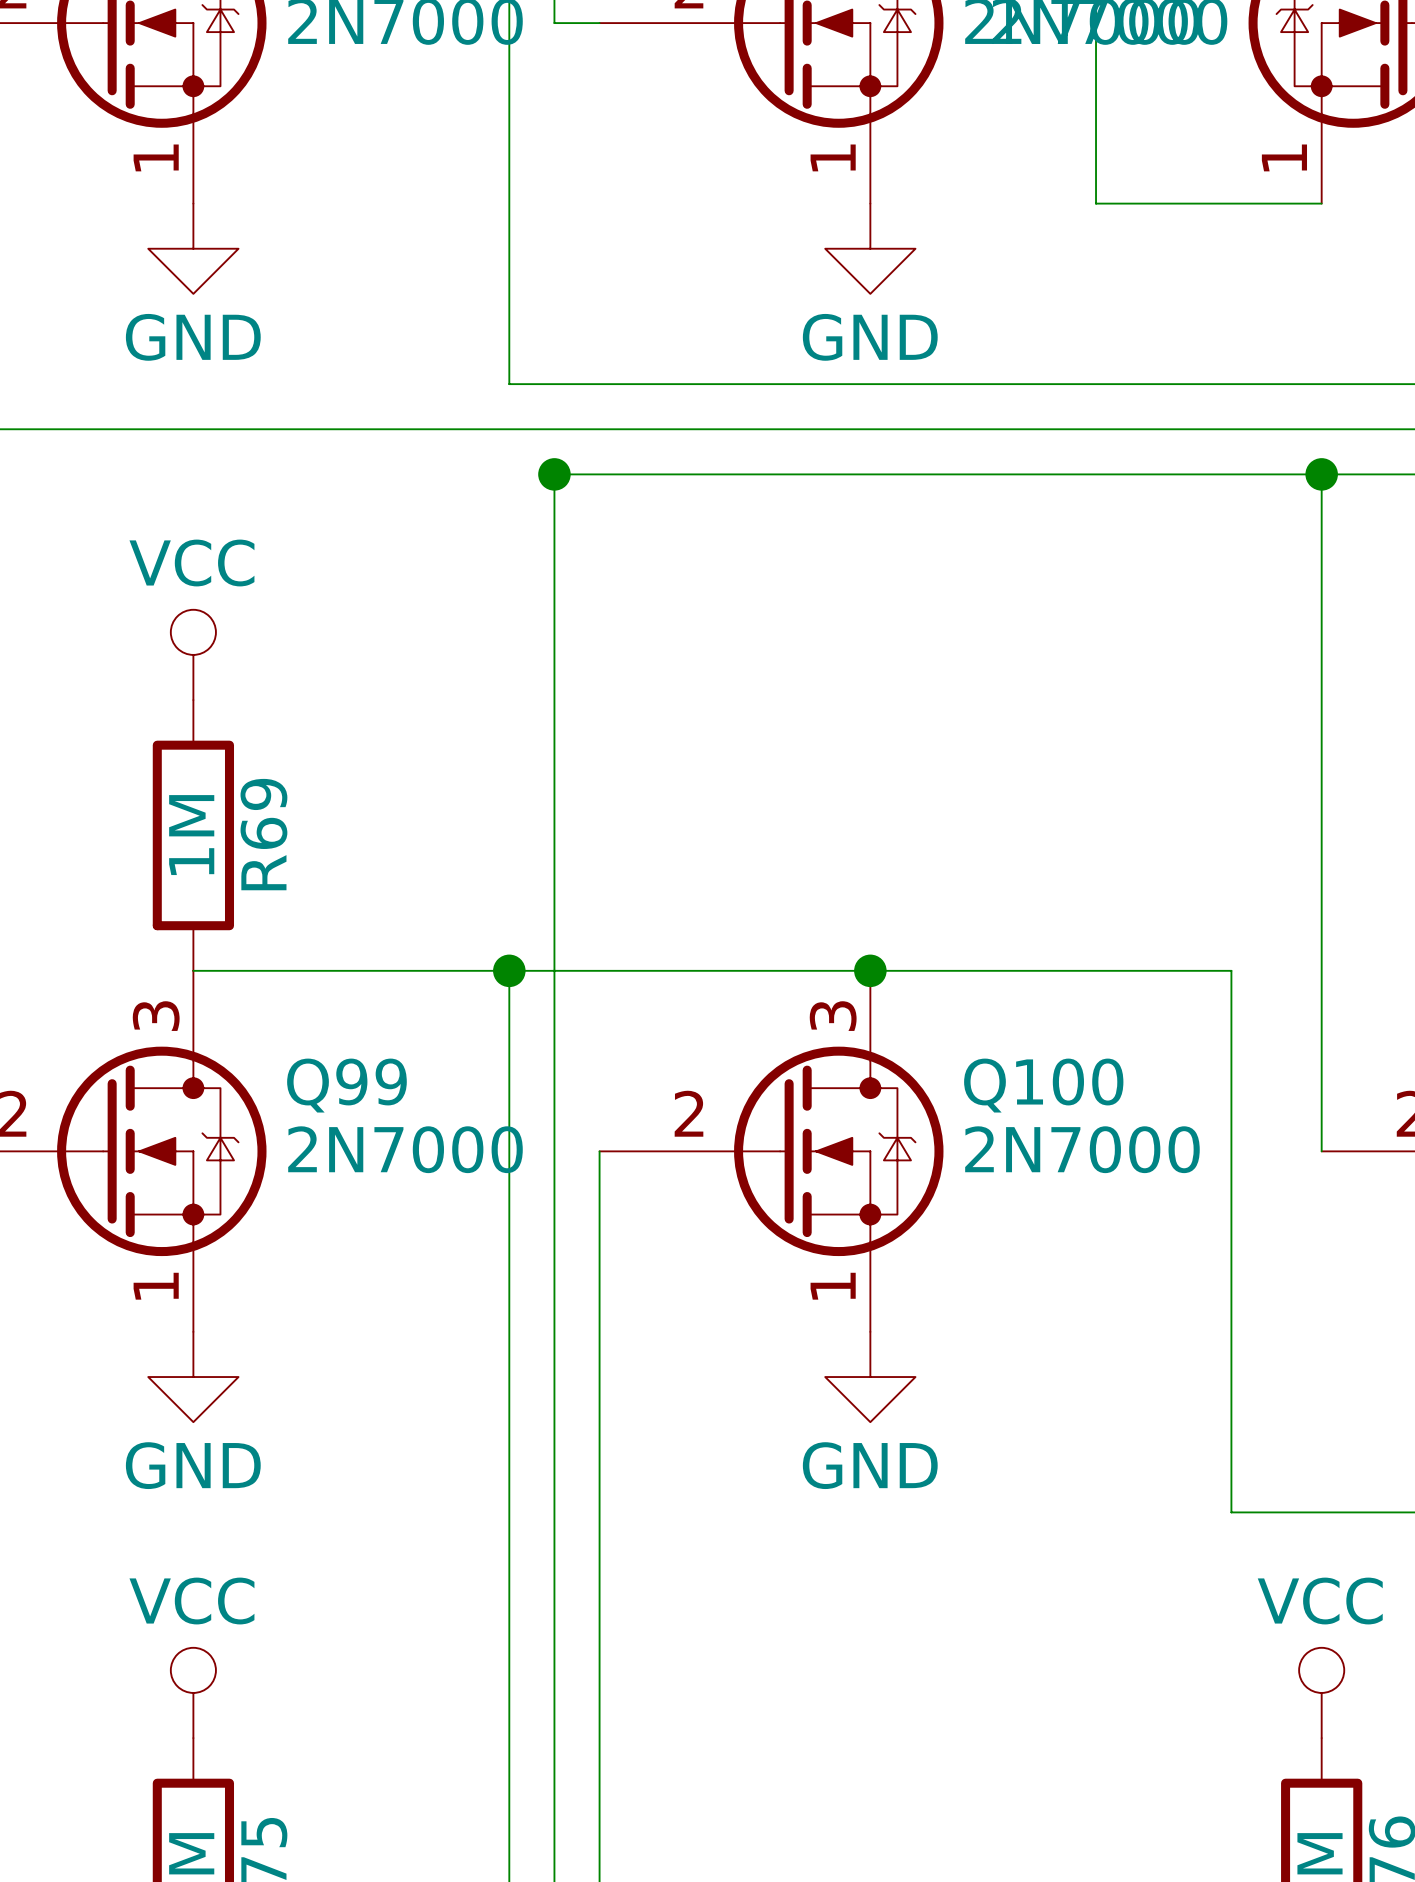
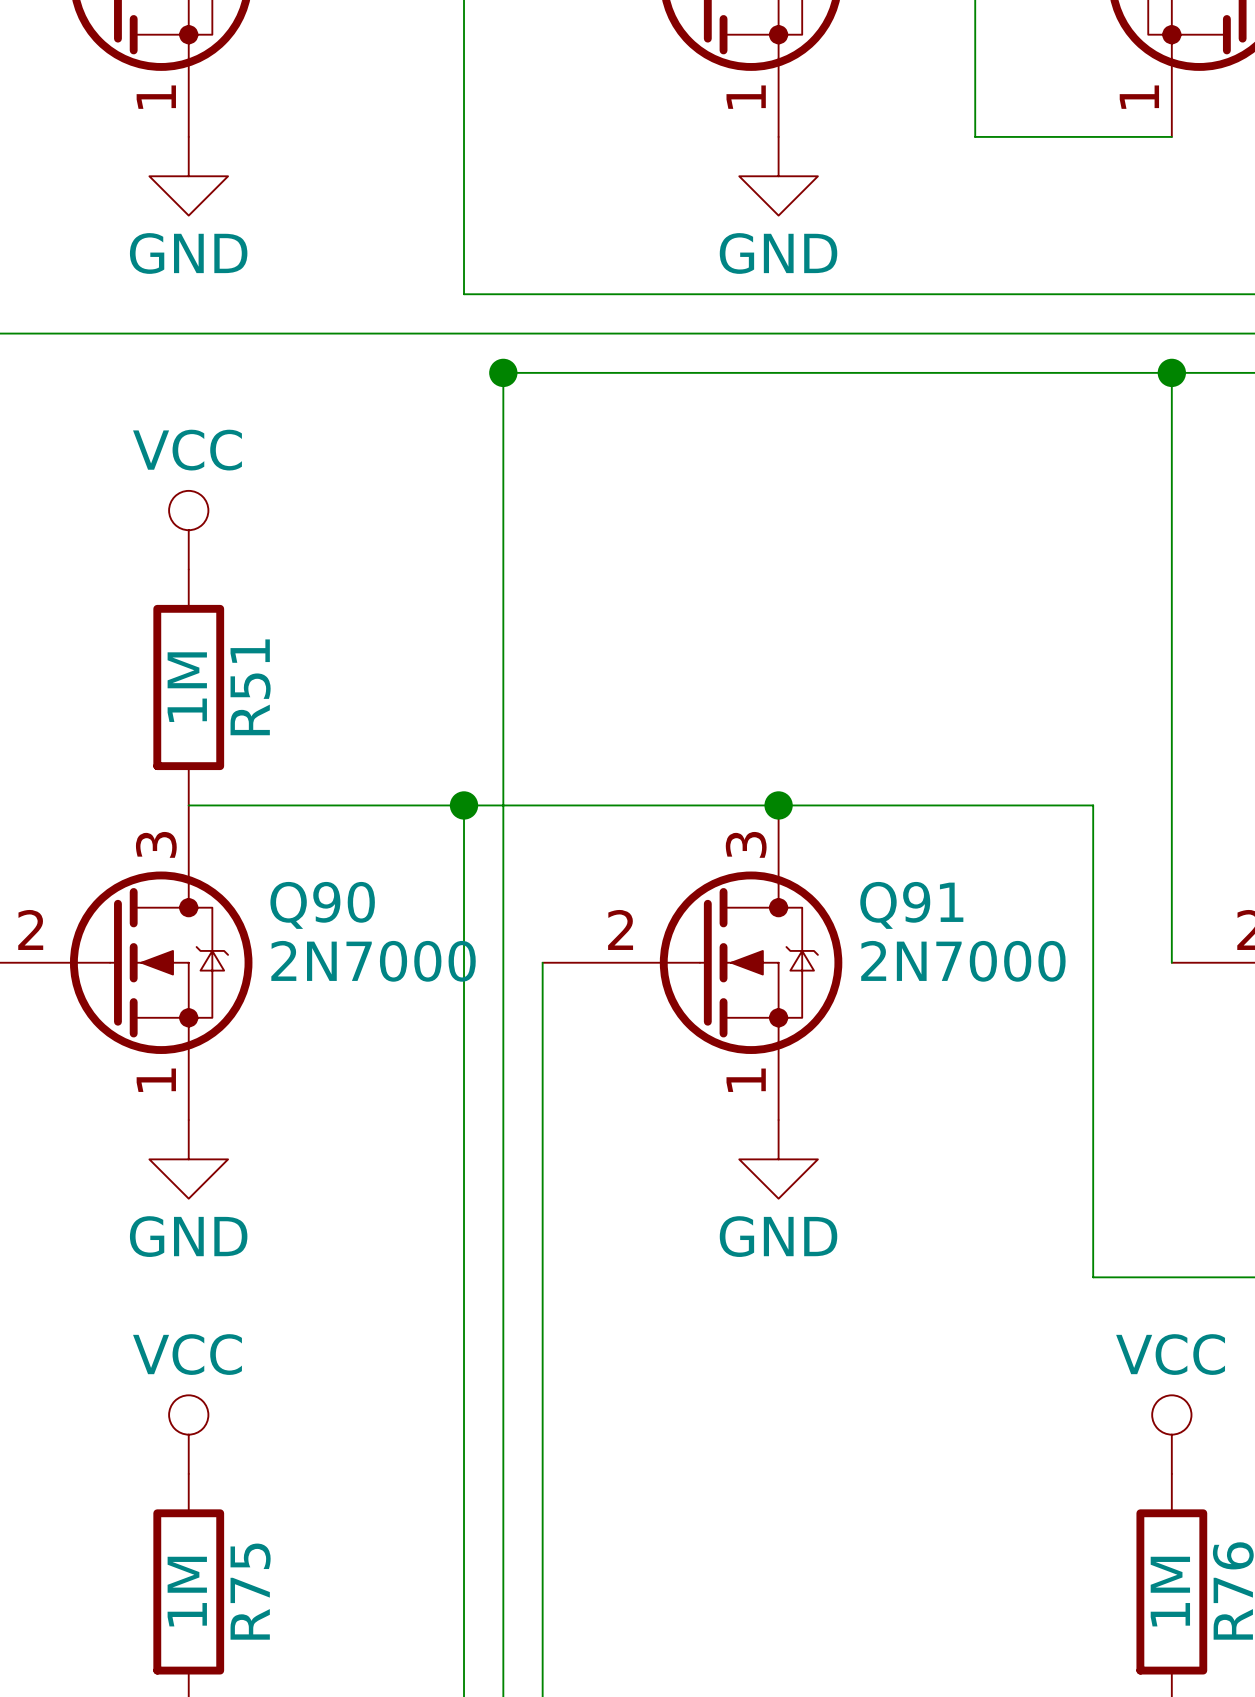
R69 name: R69 (263, 834) -> R51 (250, 687)
Q99 name: Q99 (346, 1085) -> Q90 (322, 905)
Q100 name: Q100 (1043, 1085) -> Q91 (911, 905)

